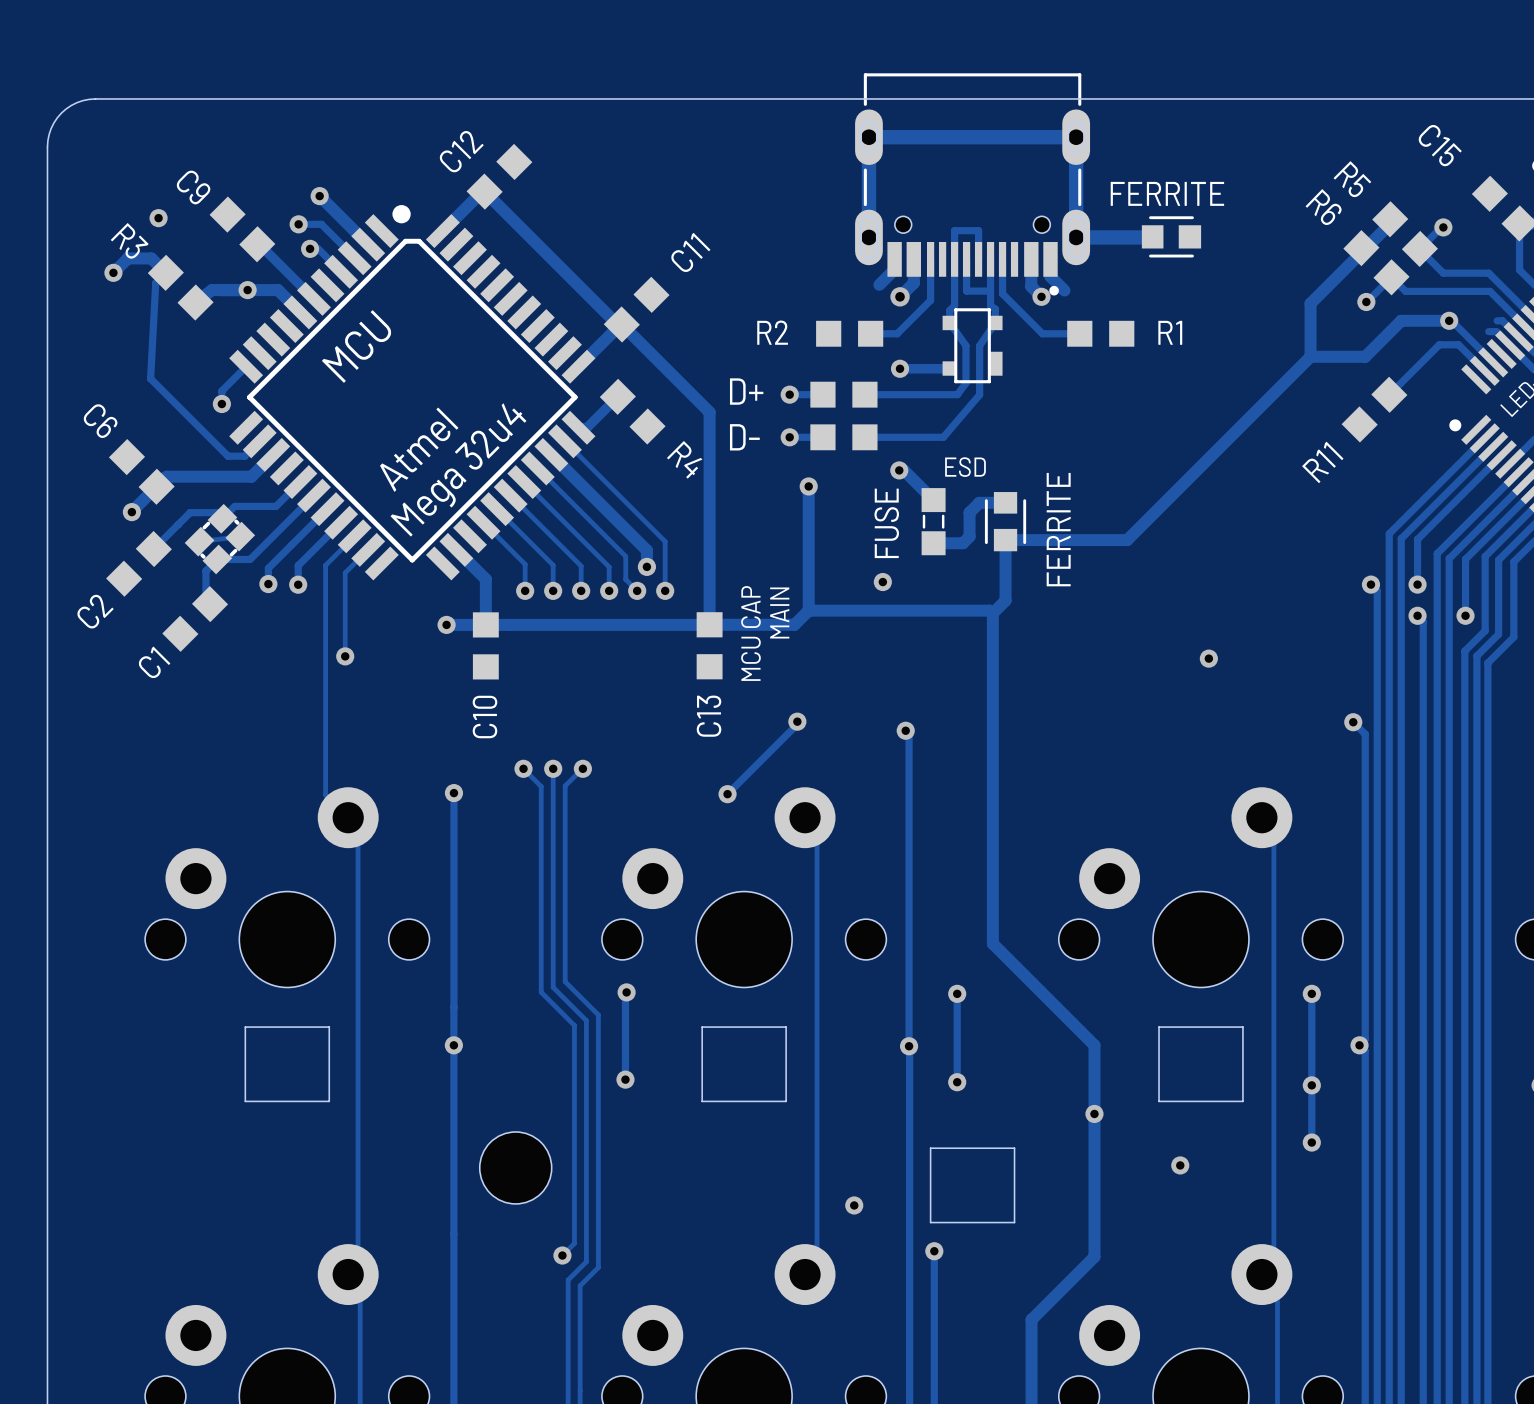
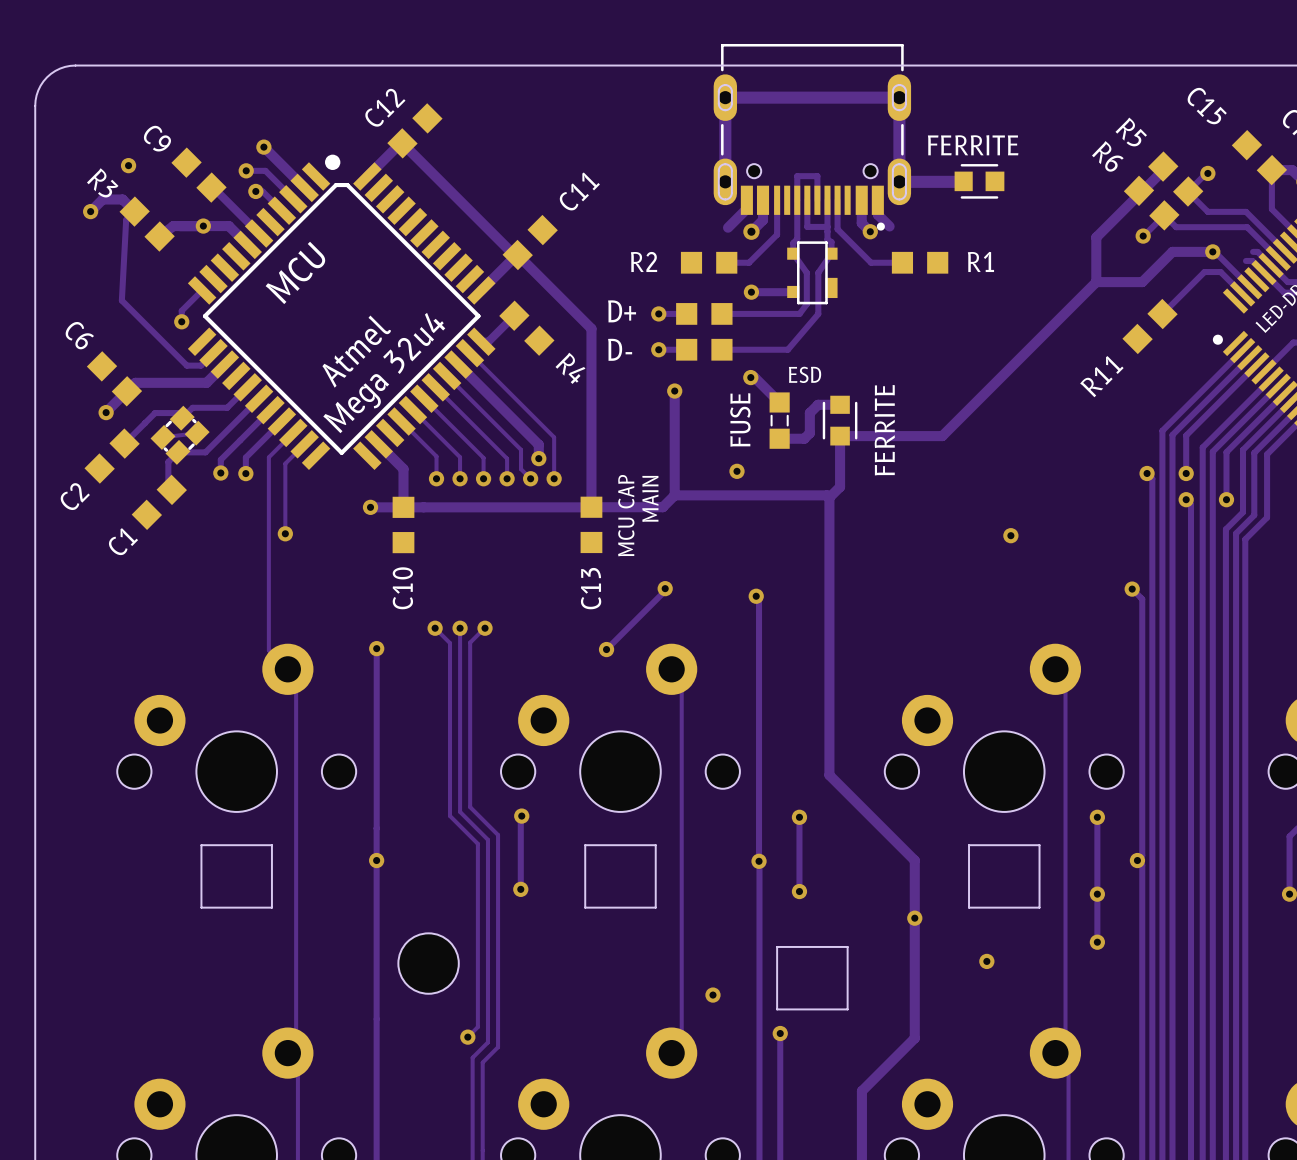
track: none -> (734, 221) (728, 227)

